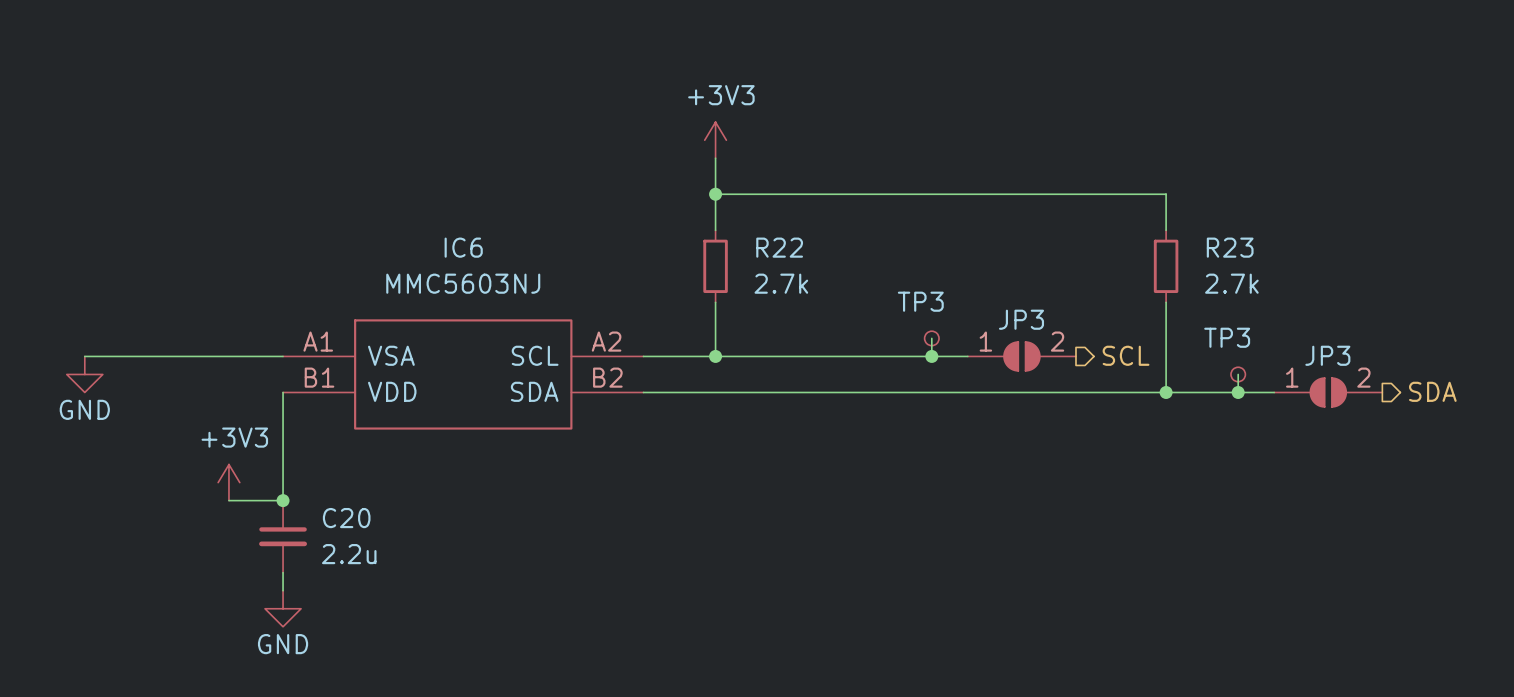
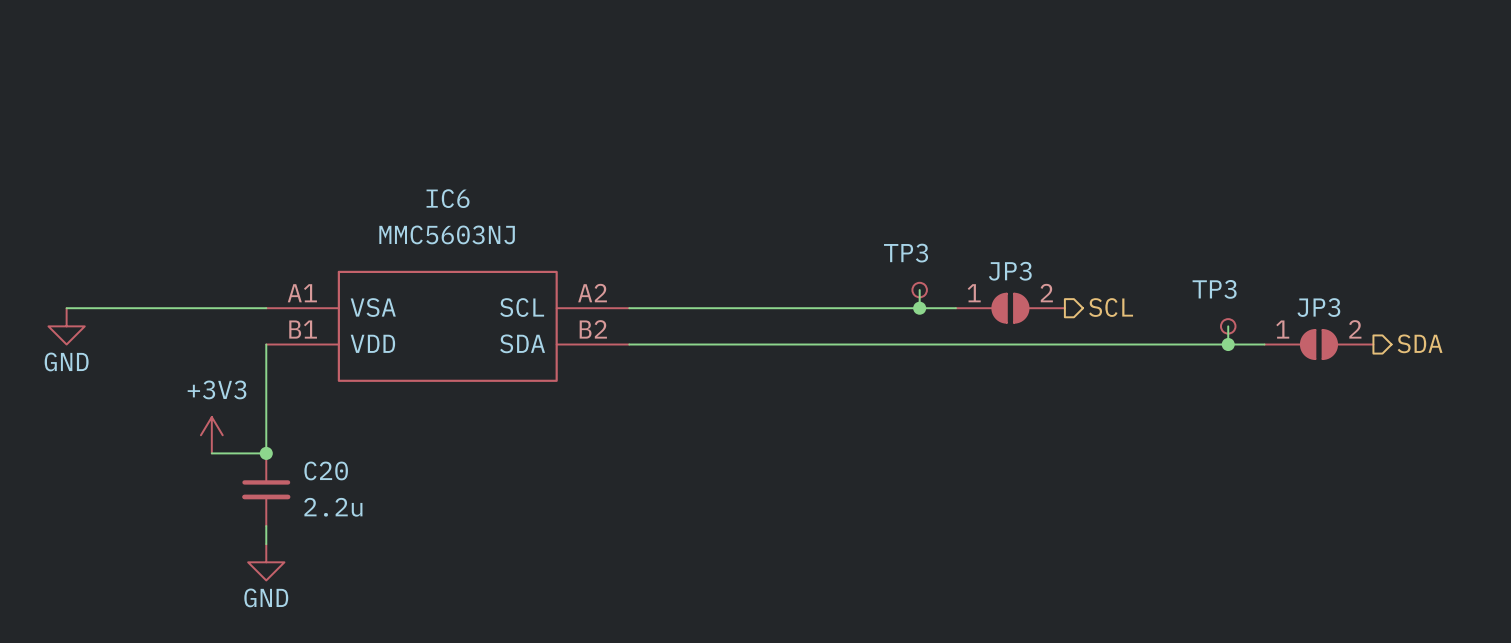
power symbol: +3V3 (715, 140) -> none
wire: (715, 158) (715, 230) -> none
wire: (715, 194) (1166, 194) (1166, 230) -> none
junction: (715, 194) -> none
R22: 2.7k (715, 266) -> none
R23: 2.7k (1166, 266) -> none
wire: (715, 302) (715, 356) -> none
wire: (1166, 302) (1166, 392) -> none
junction: (715, 356) -> none
junction: (1166, 392) -> none

